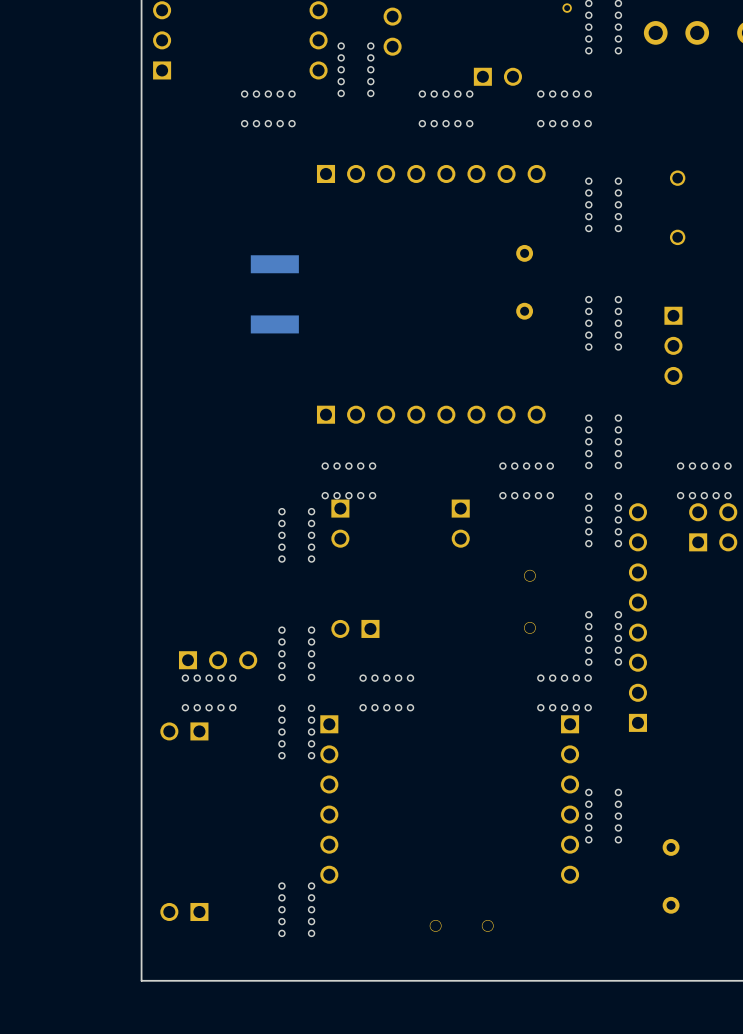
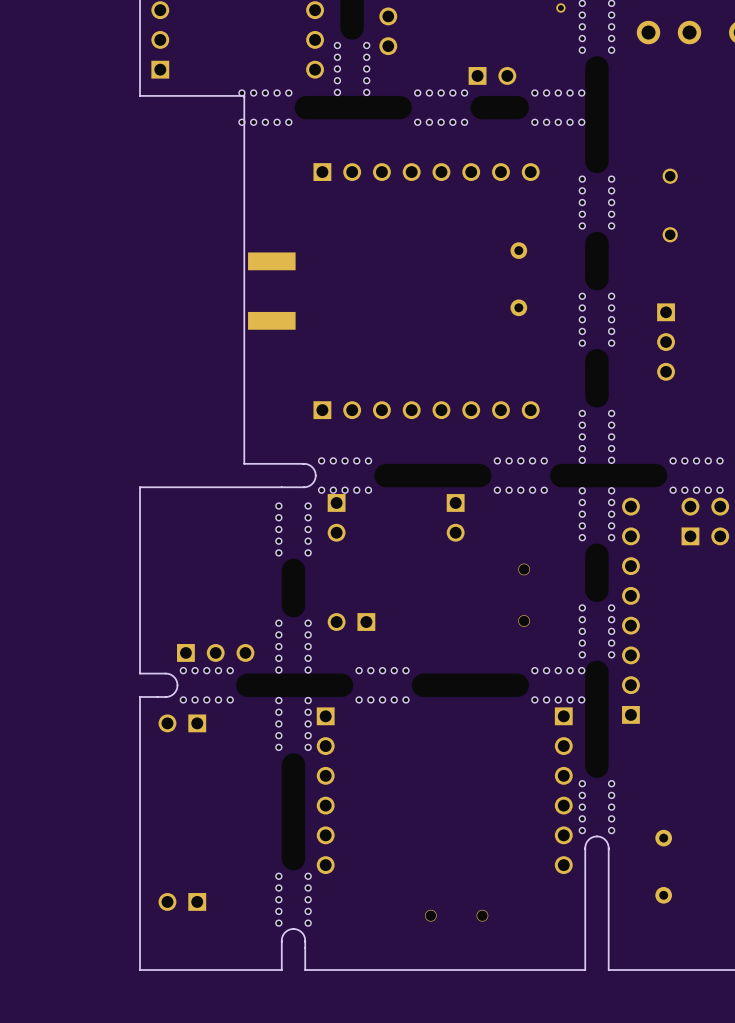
board edge: (141, 96) (141, 492) -> (140, 95) (244, 95) (244, 463) (305, 463) (312, 467) (315, 475) (312, 483) (305, 487) (140, 487)
board edge: (141, 681) (141, 704) -> (140, 673) (168, 673) (175, 678) (177, 685) (175, 692) (168, 696) (140, 697)
board edge: (308, 980) (284, 980) -> (305, 970) (304, 937) (300, 931) (293, 929) (286, 931) (282, 937) (281, 970)
board edge: (615, 980) (591, 980) -> (608, 970) (608, 846) (604, 838) (596, 836) (589, 838) (585, 846) (585, 970)

